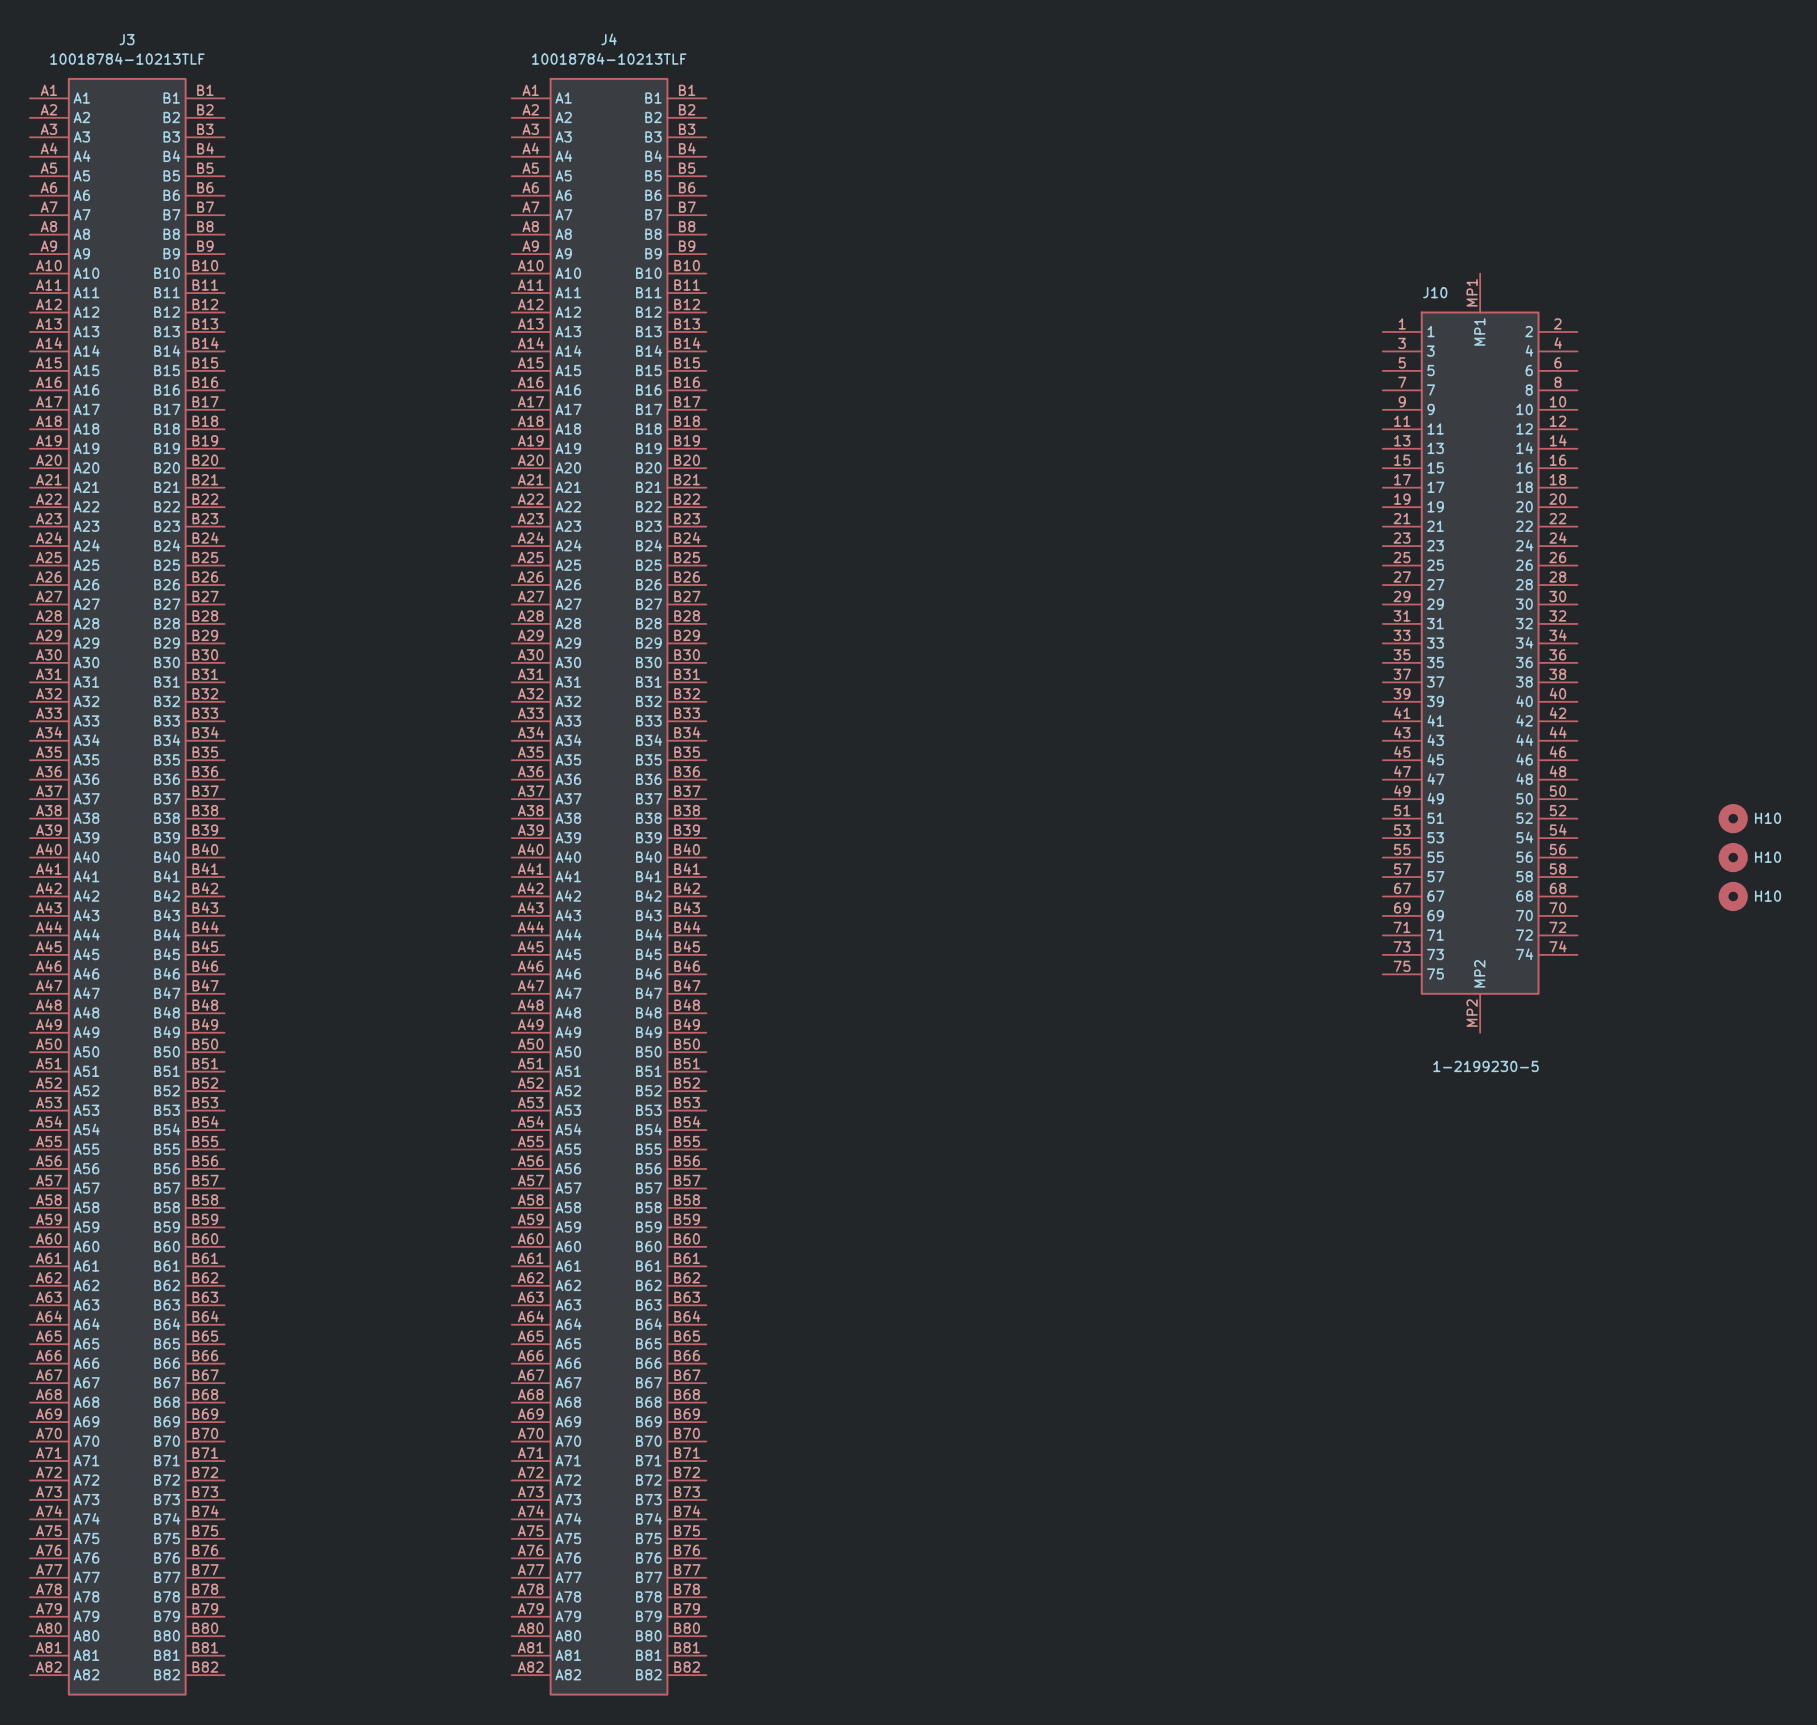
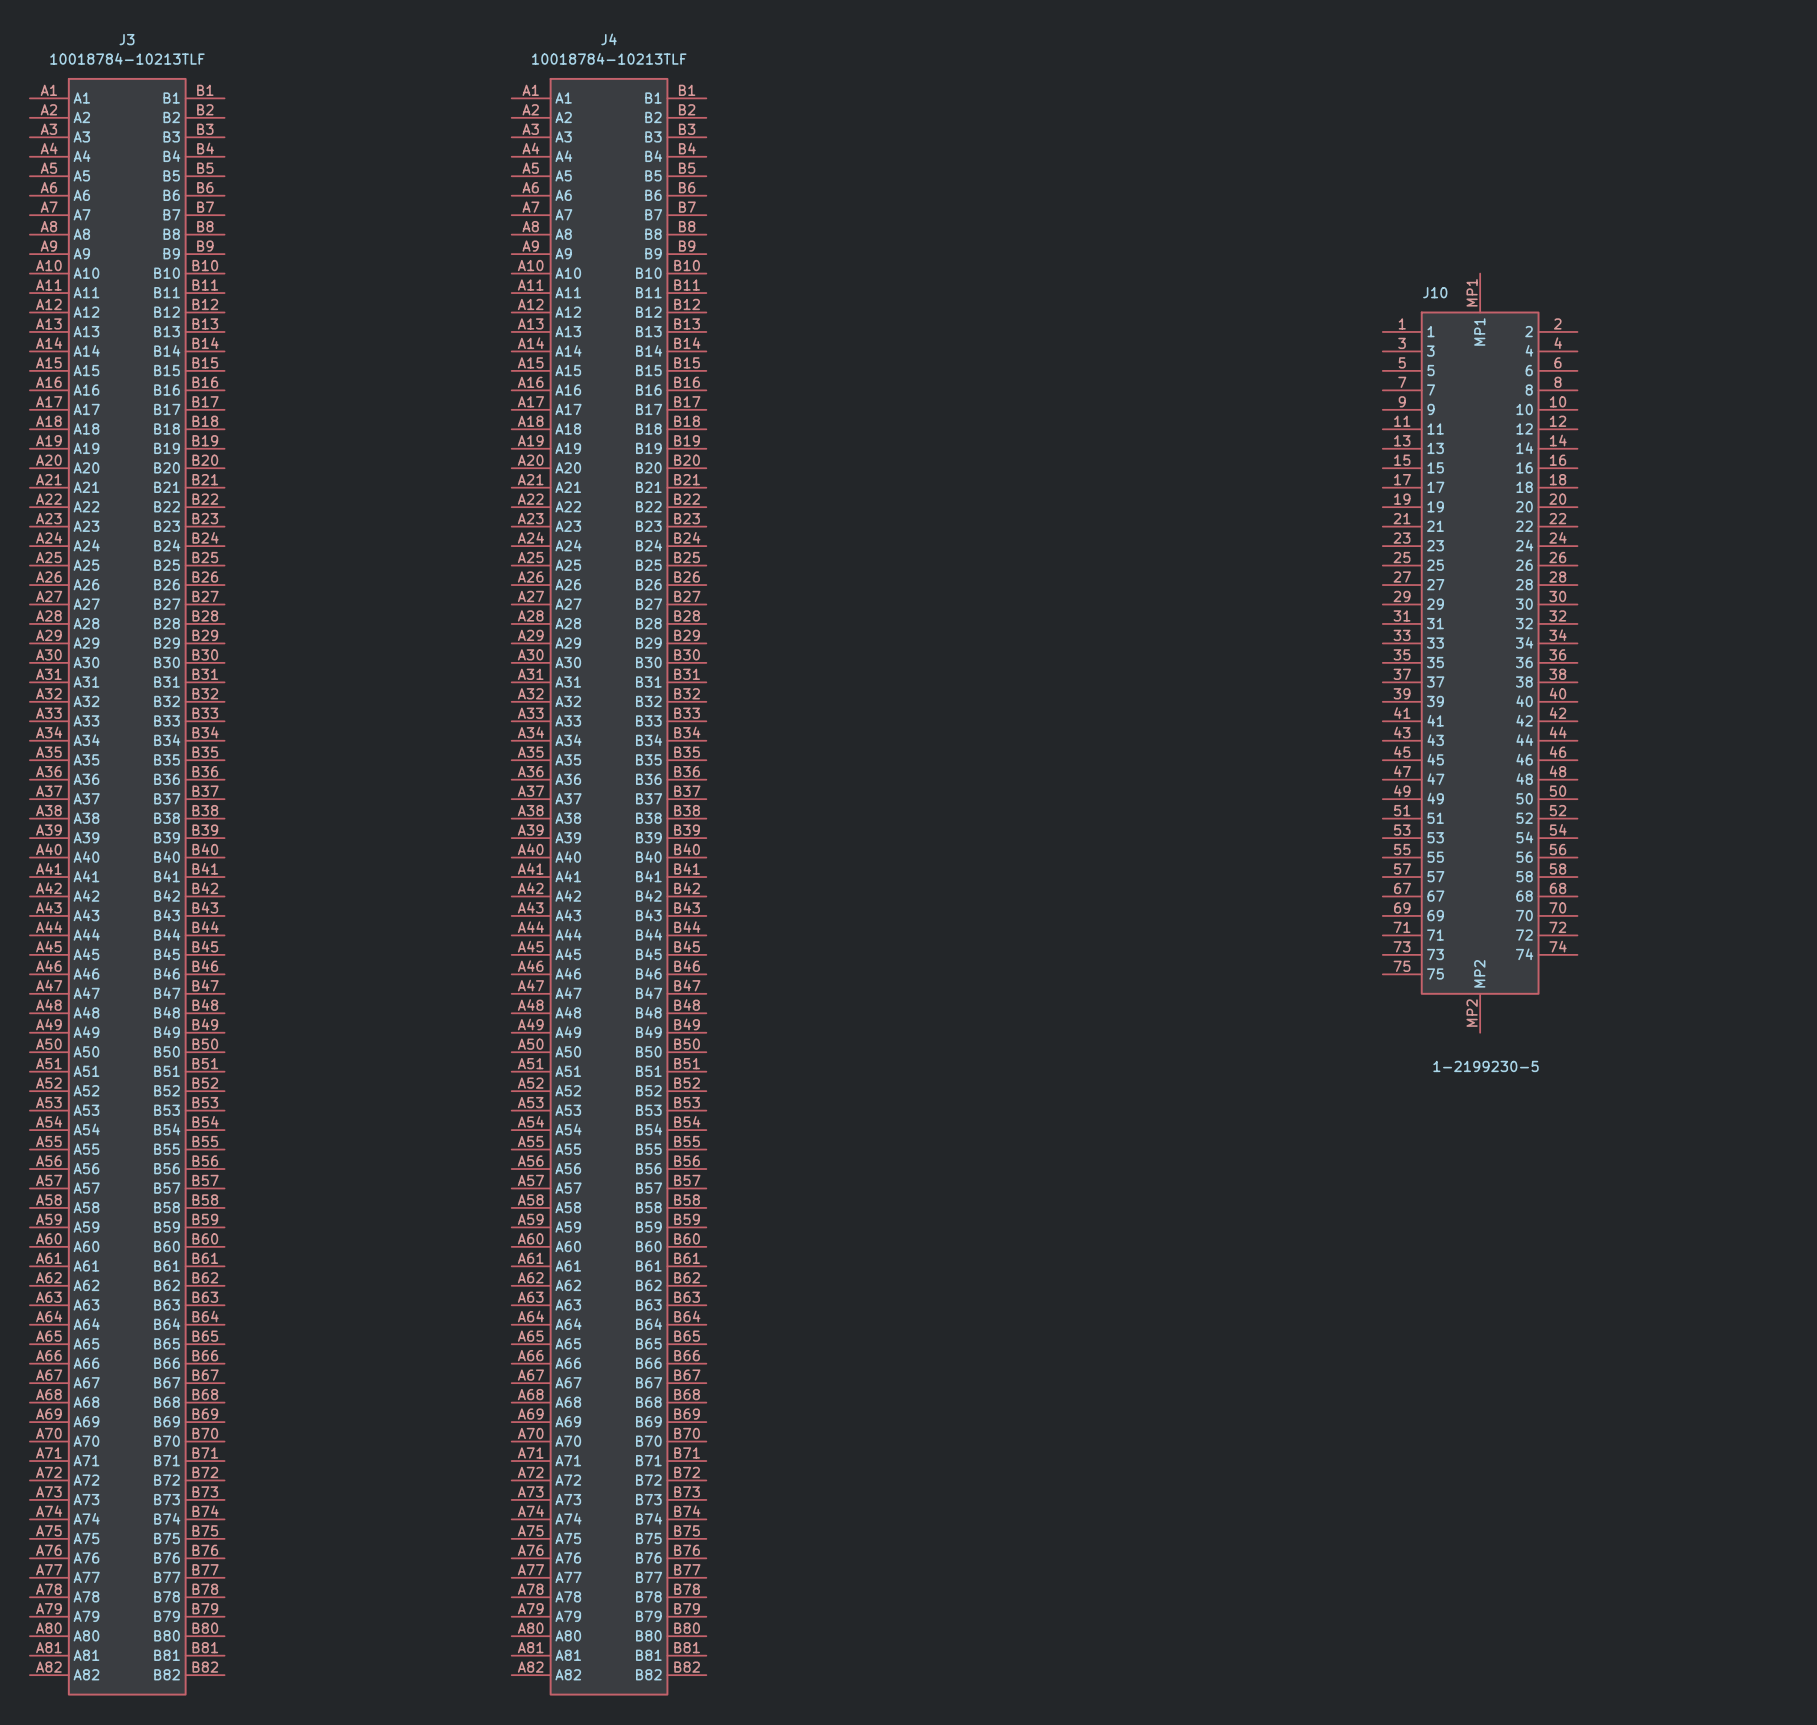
H10: (1733, 818) -> none
H10: (1733, 857) -> none
H10: (1733, 896) -> none

